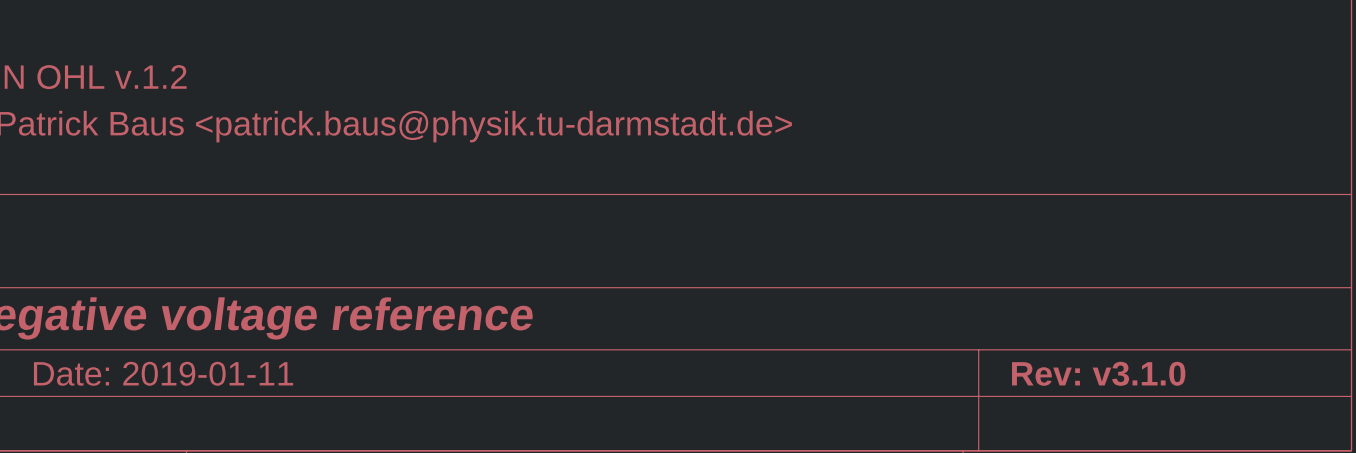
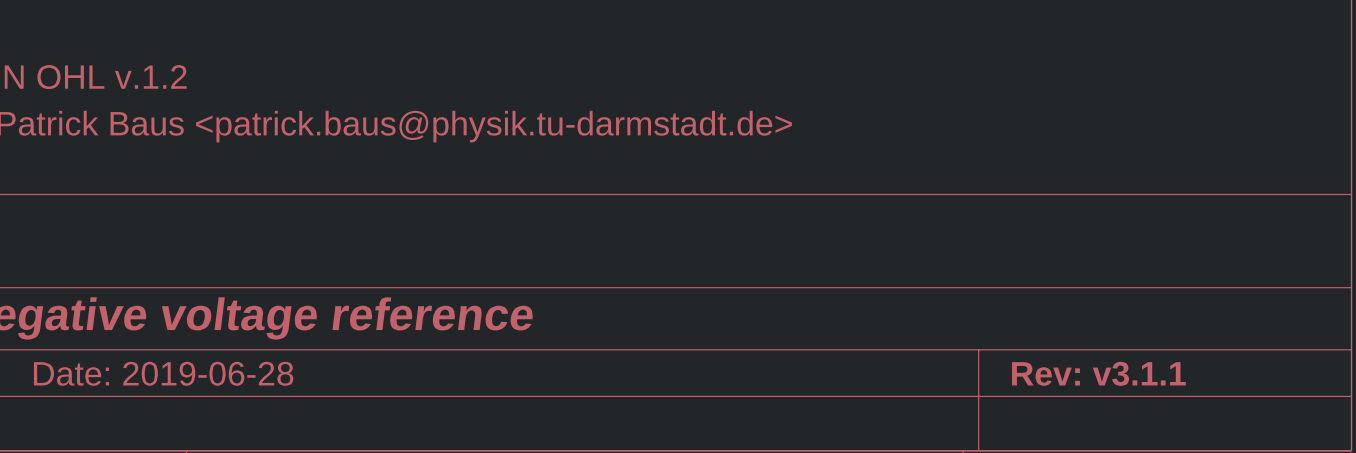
title block: Date: 2019-01-11 (163, 373) -> Date: 2019-06-28 (163, 373)
title block: Rev: v3.1.0 (1098, 373) -> Rev: v3.1.1 (1098, 373)

